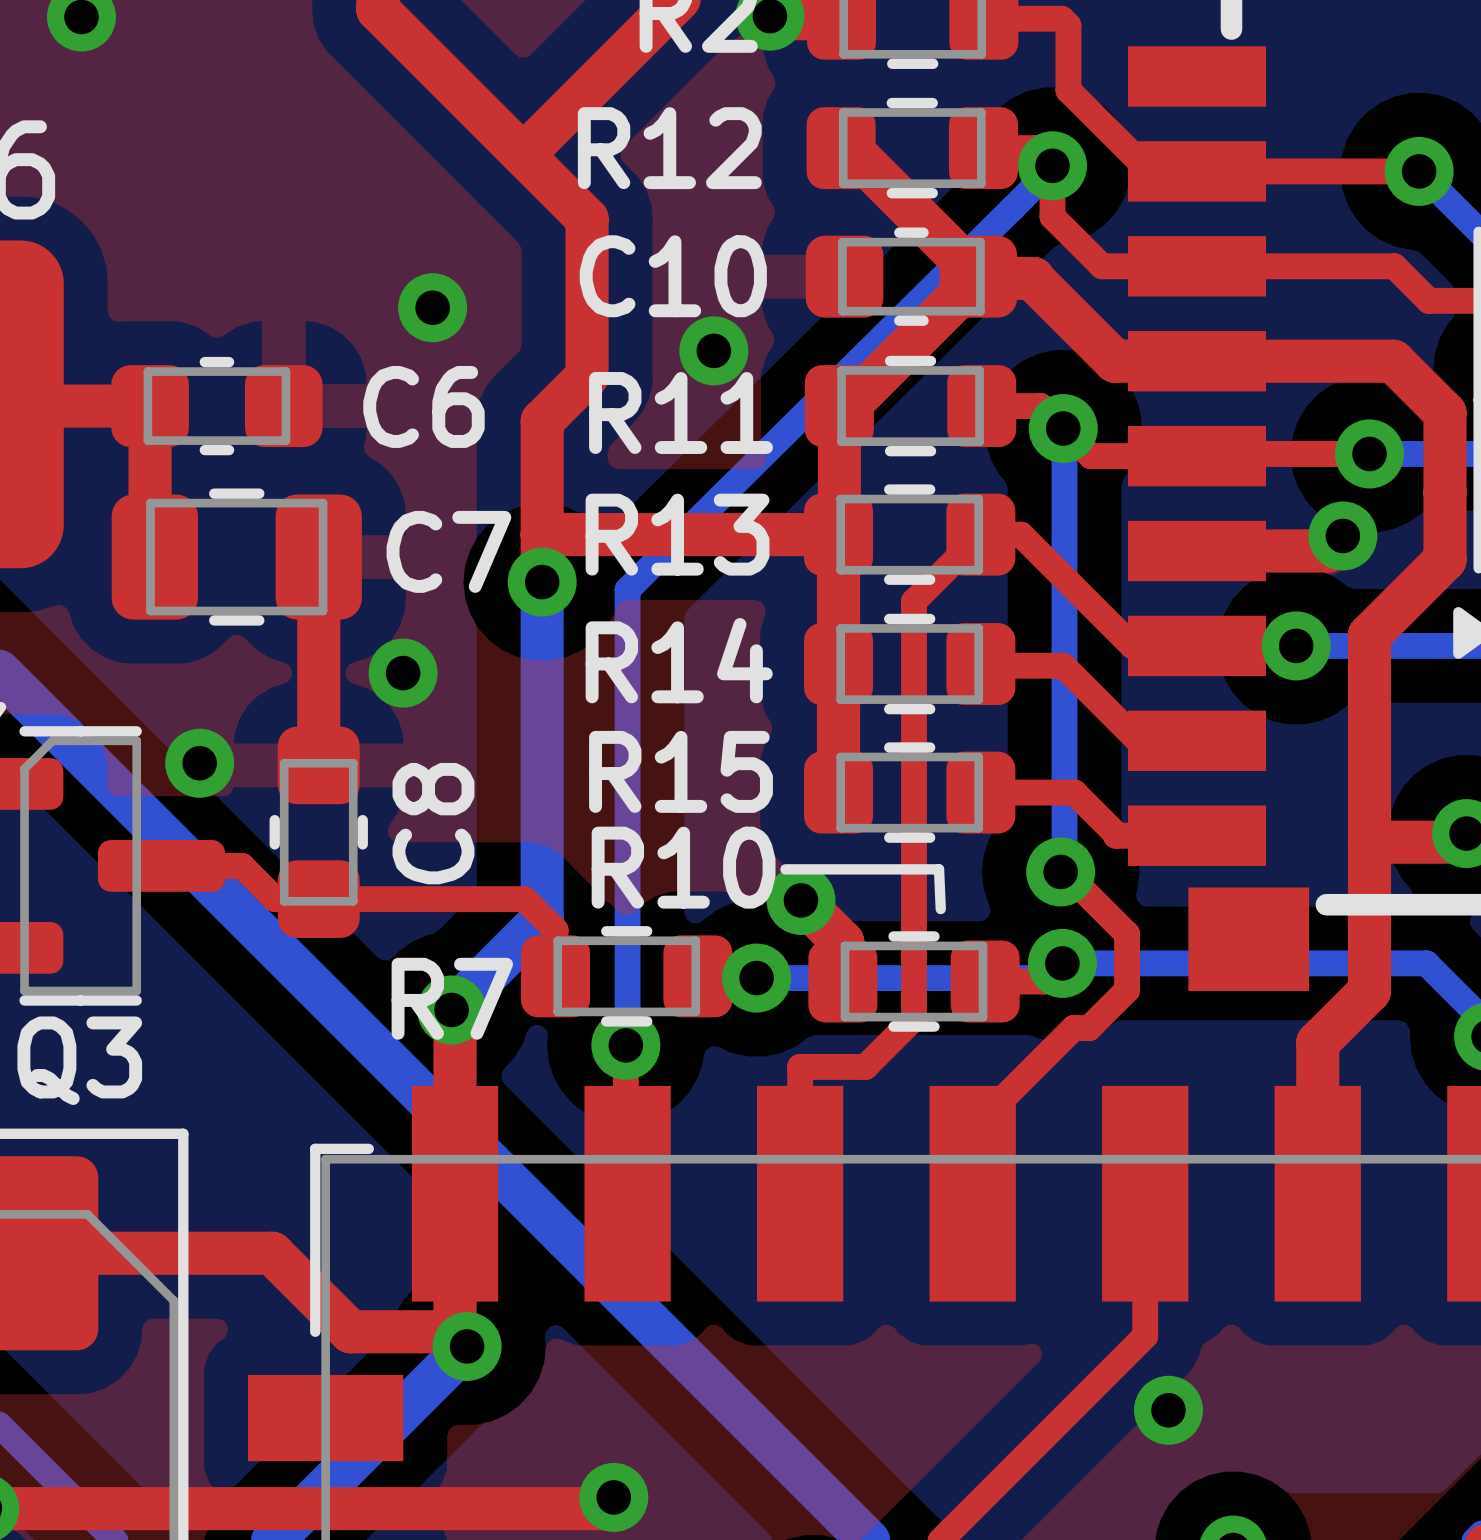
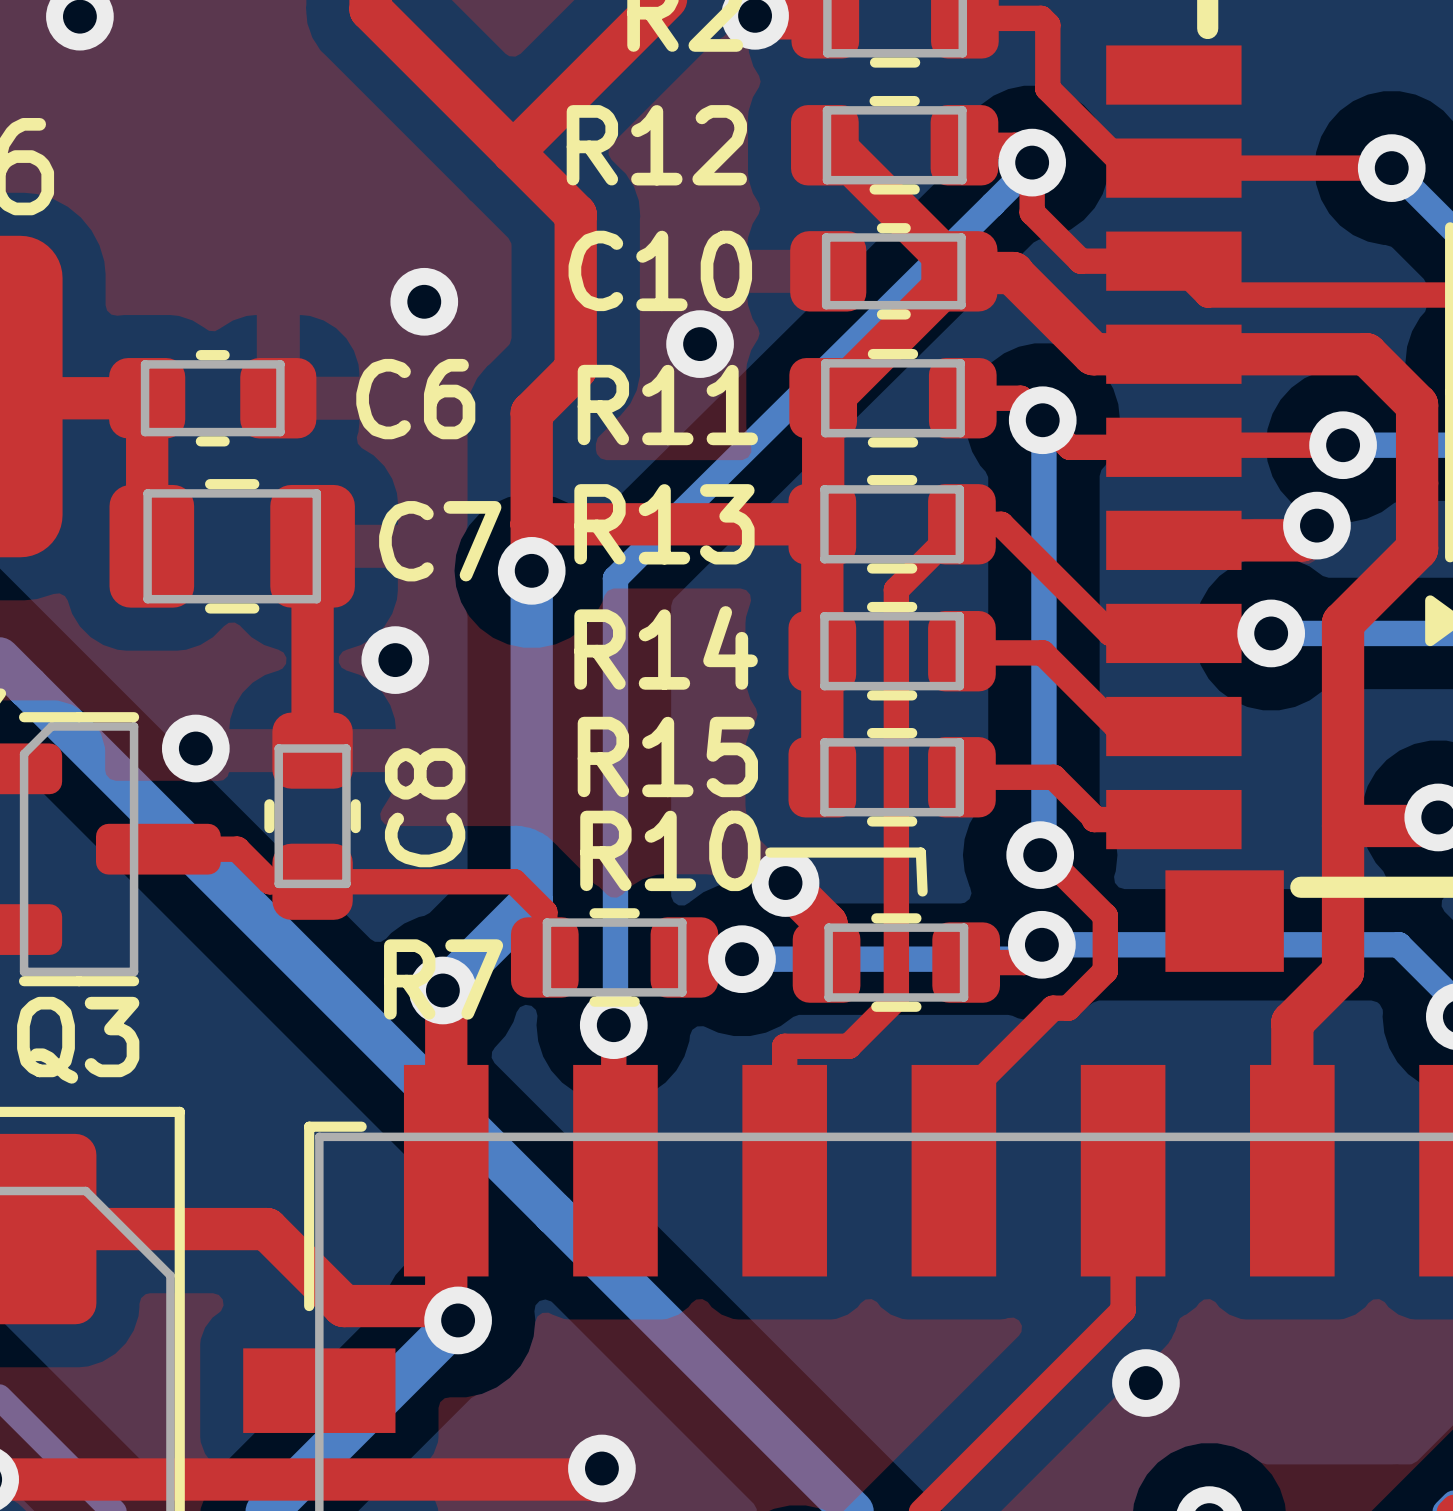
top track: (1196, 266) (1394, 266) (1428, 300) -> (1173, 261) (1207, 295) (1401, 295)

